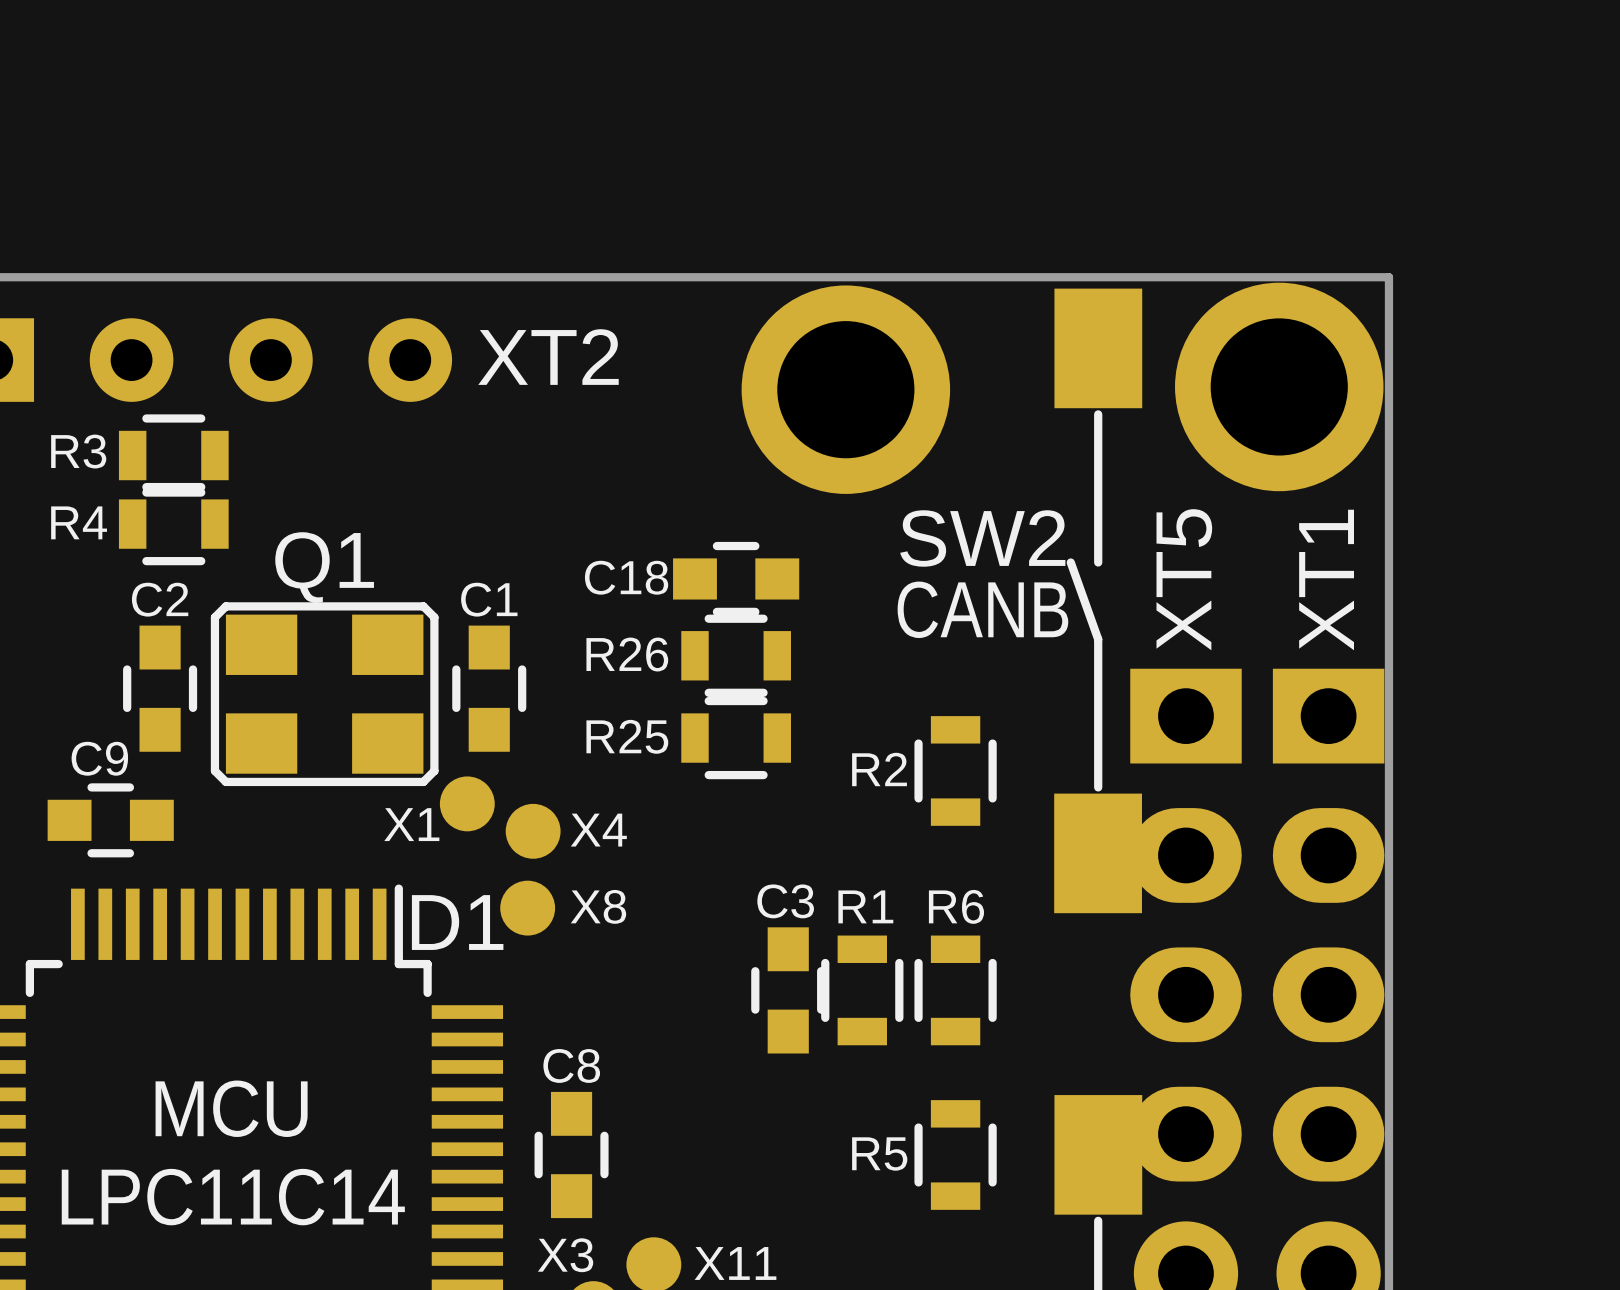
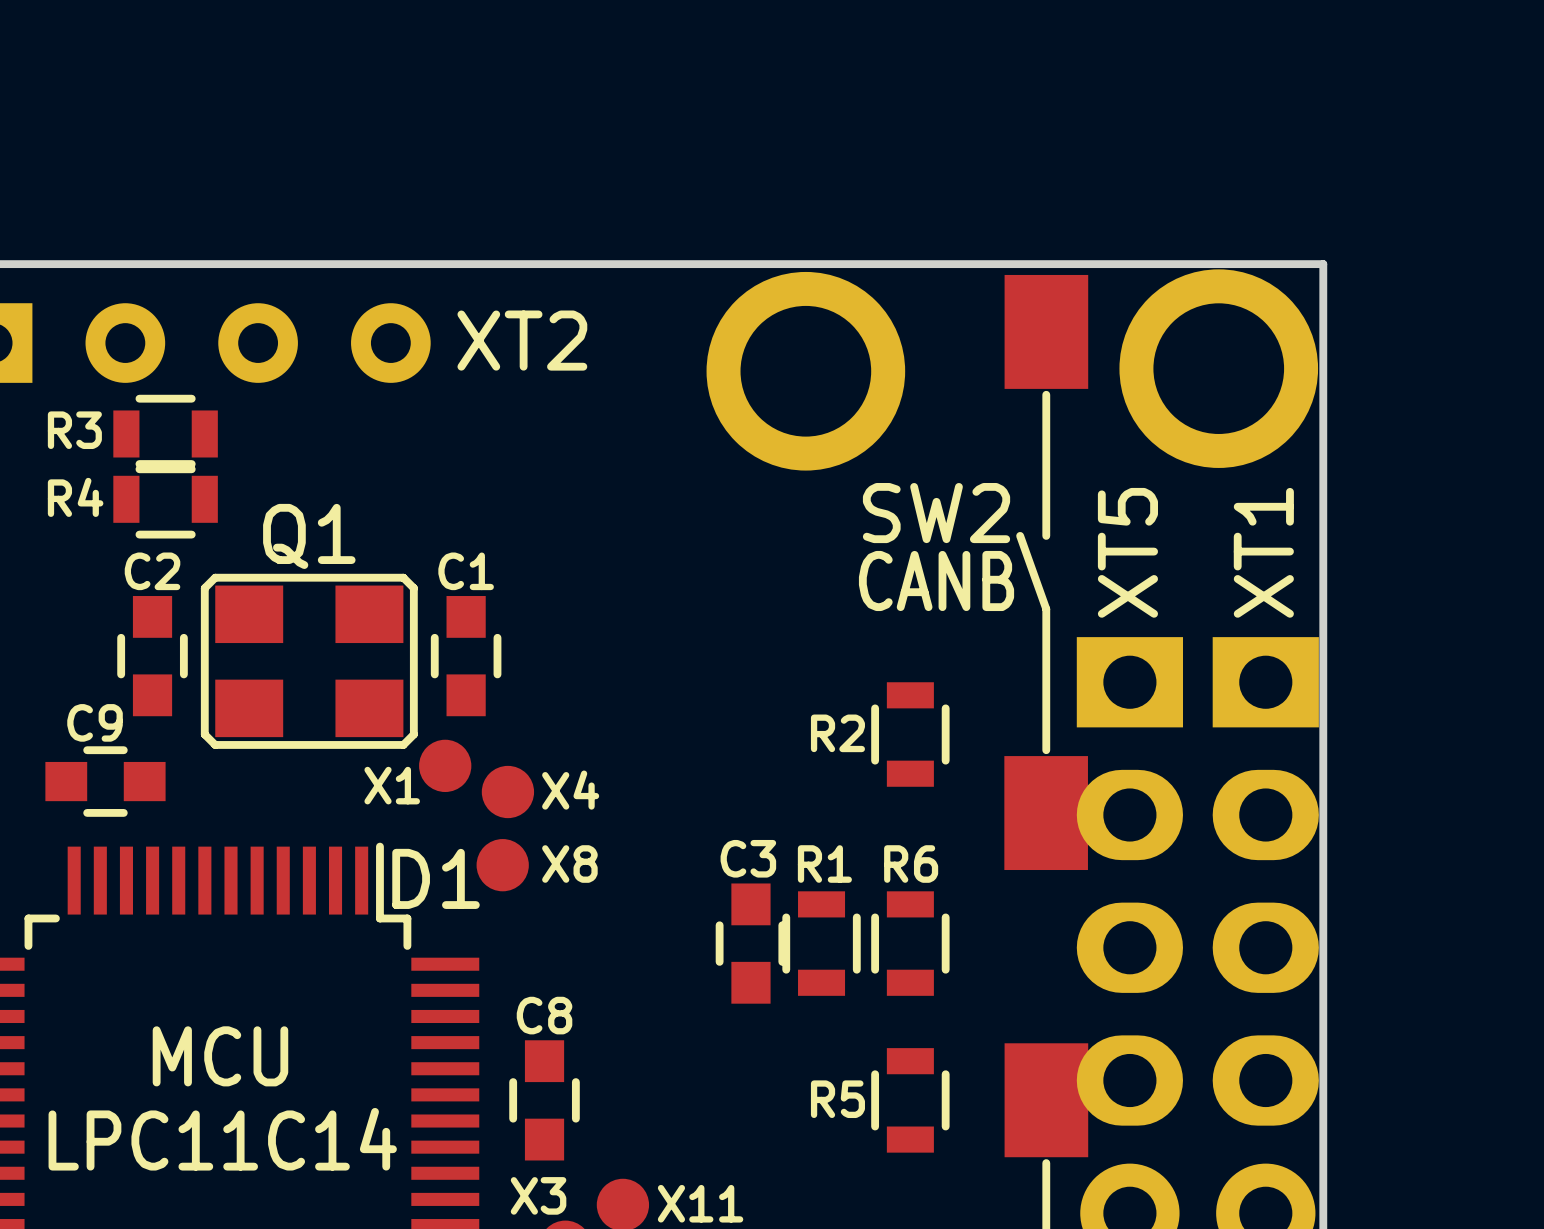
C18: (736, 578) -> none
R26: (736, 655) -> none
R25: (736, 738) -> none

